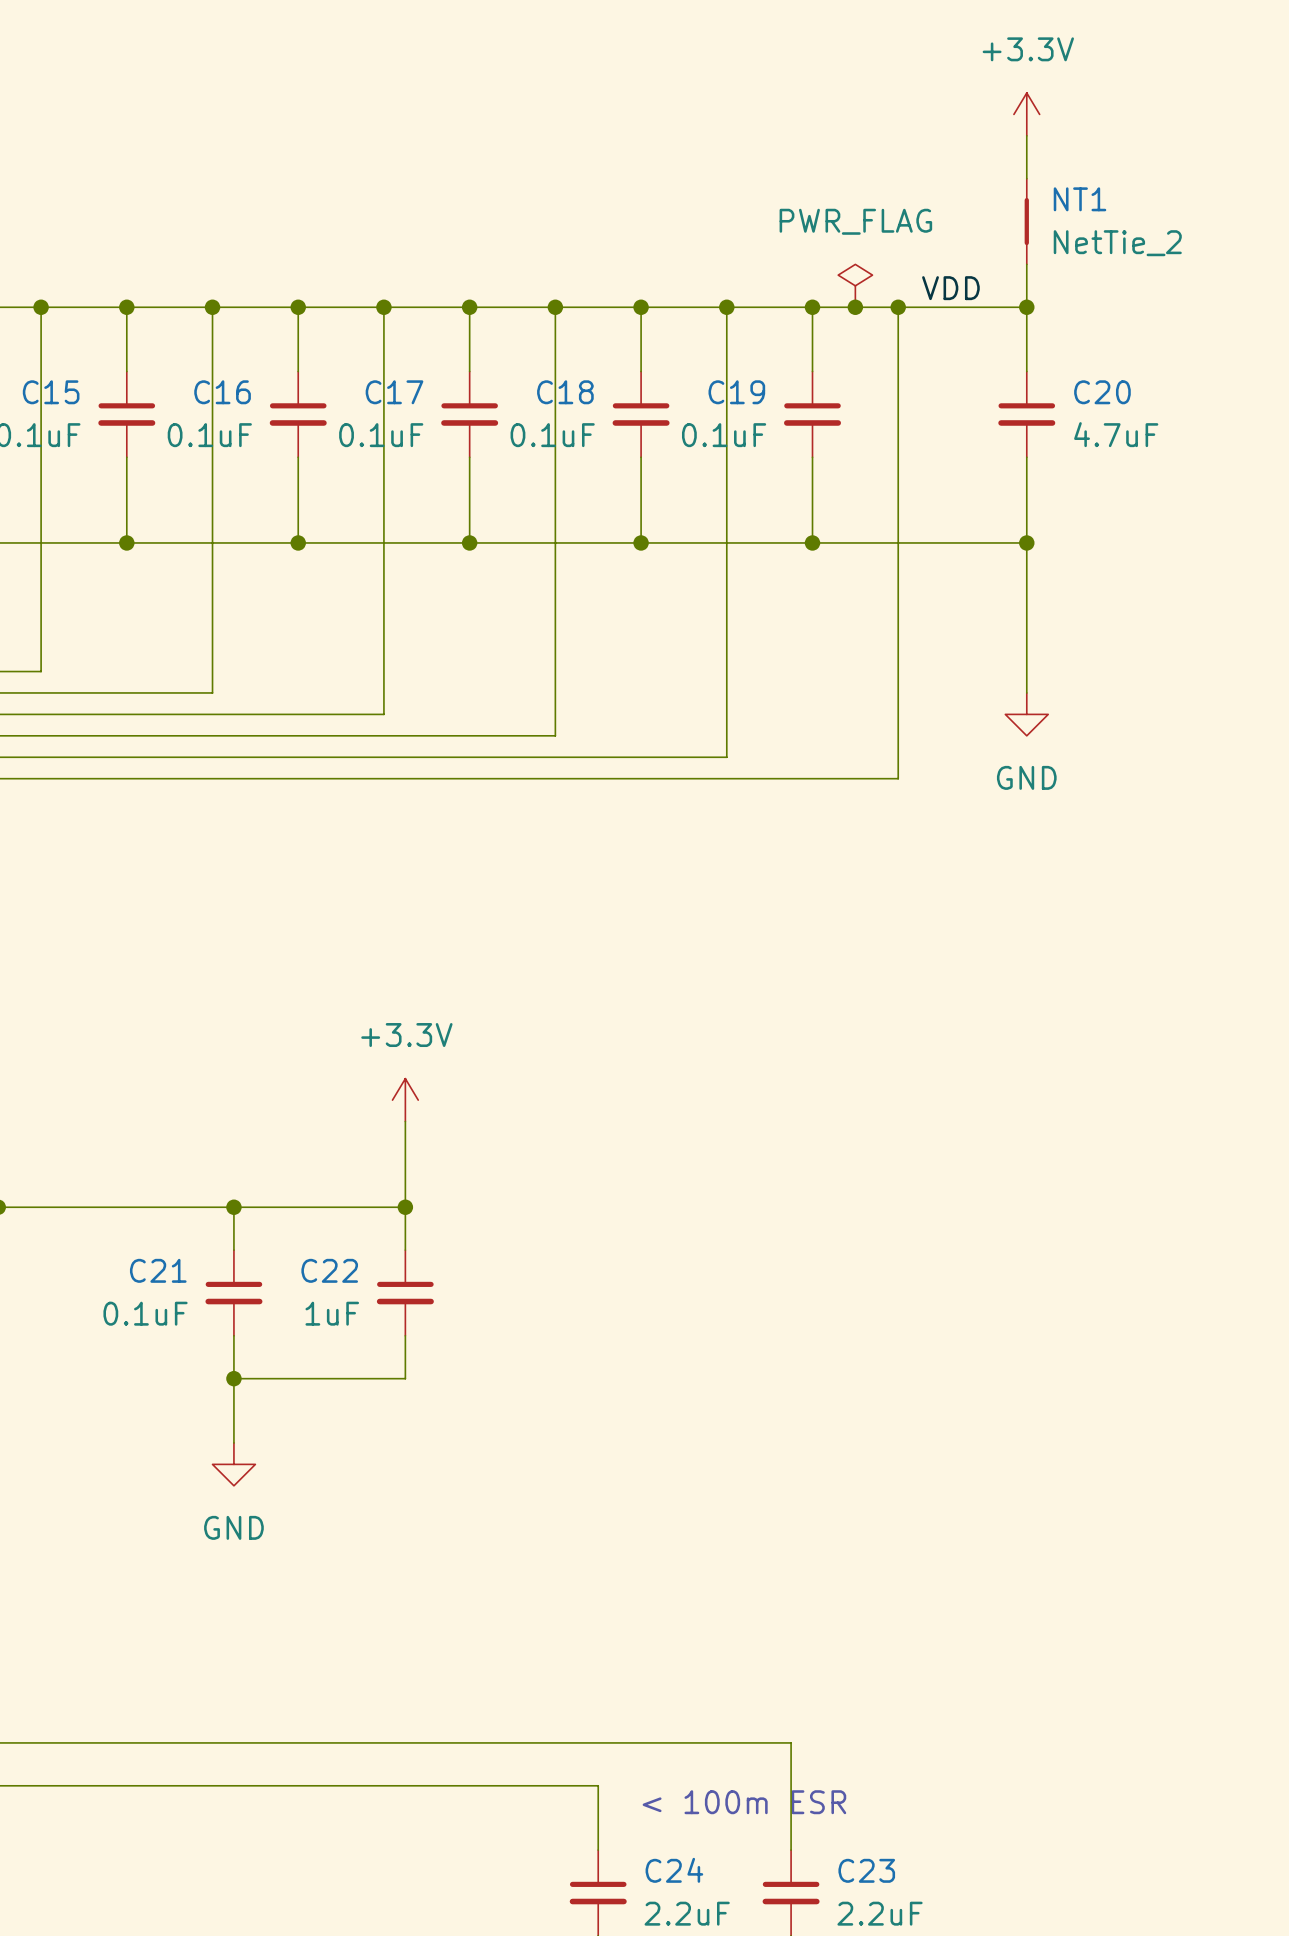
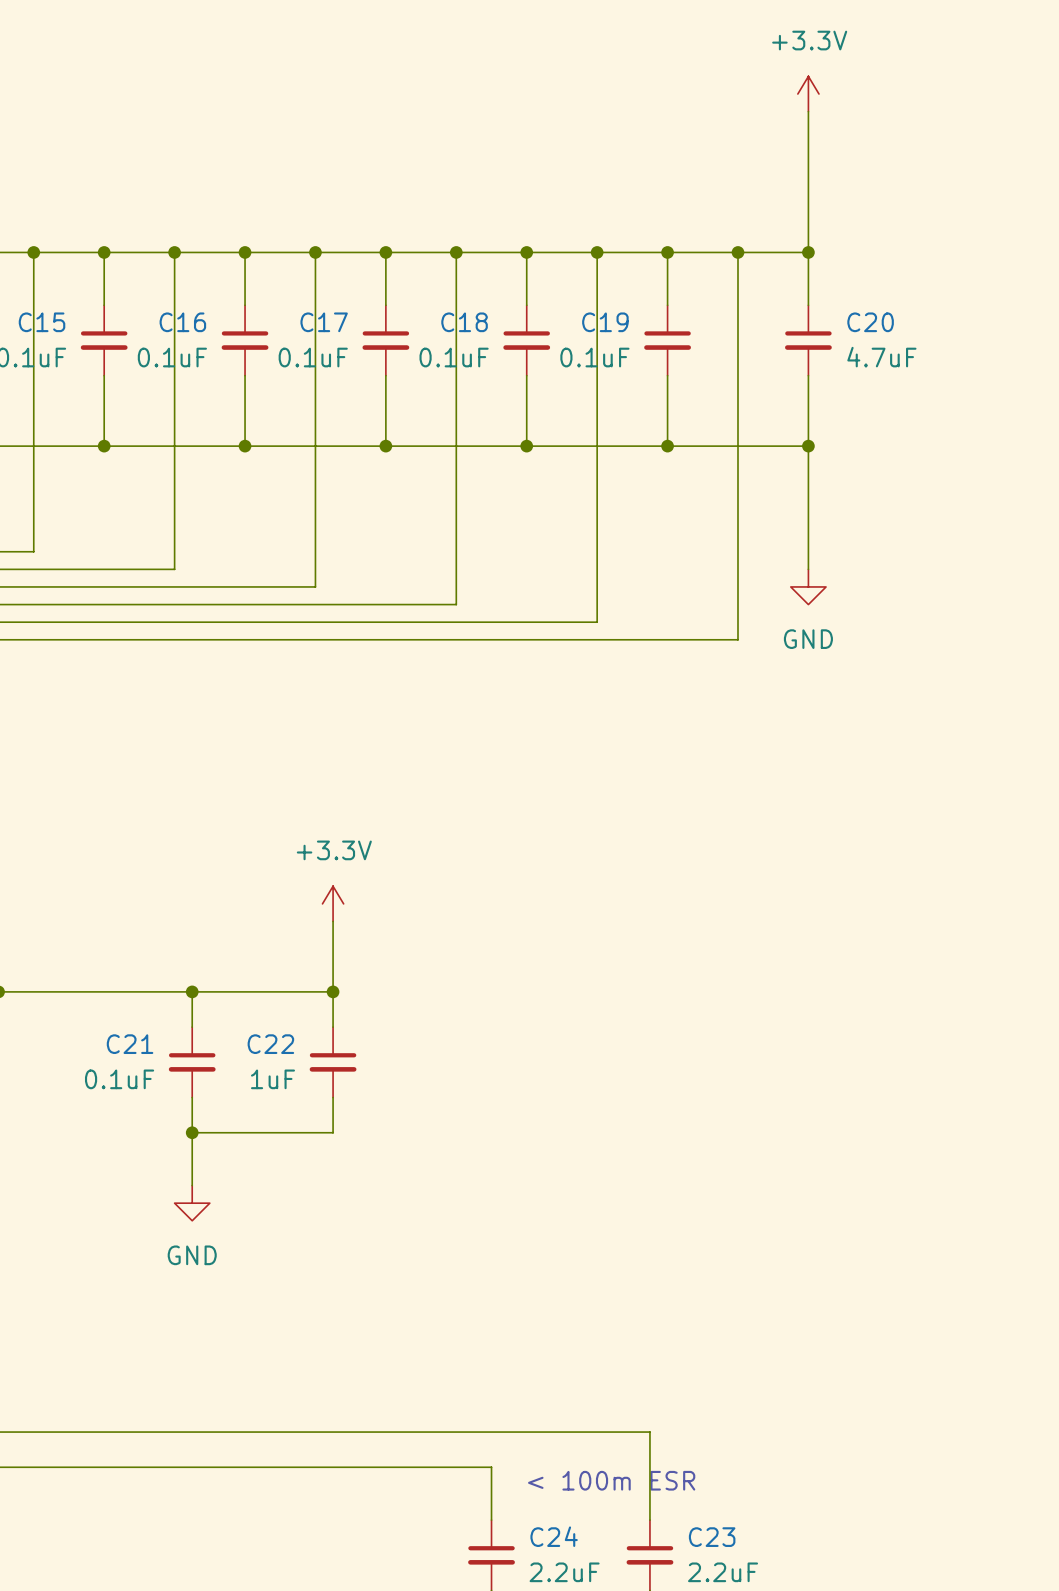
power symbol position: +3.3V (1026, 114) -> +3.3V (808, 94)
wire: none -> (808, 111) (808, 305)
wire: (1026, 135) (1026, 178) -> none
NT1: NetTie_2 (1026, 221) -> none
wire: (1026, 264) (1026, 371) -> none
power symbol: PWR_FLAG (855, 285) -> none
label: VDD (950, 288) -> none
junction: (855, 307) -> none
wire: (983, 307) (1026, 307) -> none
junction position: (1026, 307) -> (808, 252)
C20 position: (1026, 414) -> (808, 340)
wire: (1026, 457) (1026, 692) -> (808, 375) (808, 569)
wire: (983, 542) (1026, 542) -> none
junction position: (1026, 542) -> (808, 446)
power symbol position: GND (1026, 714) -> GND (808, 586)

